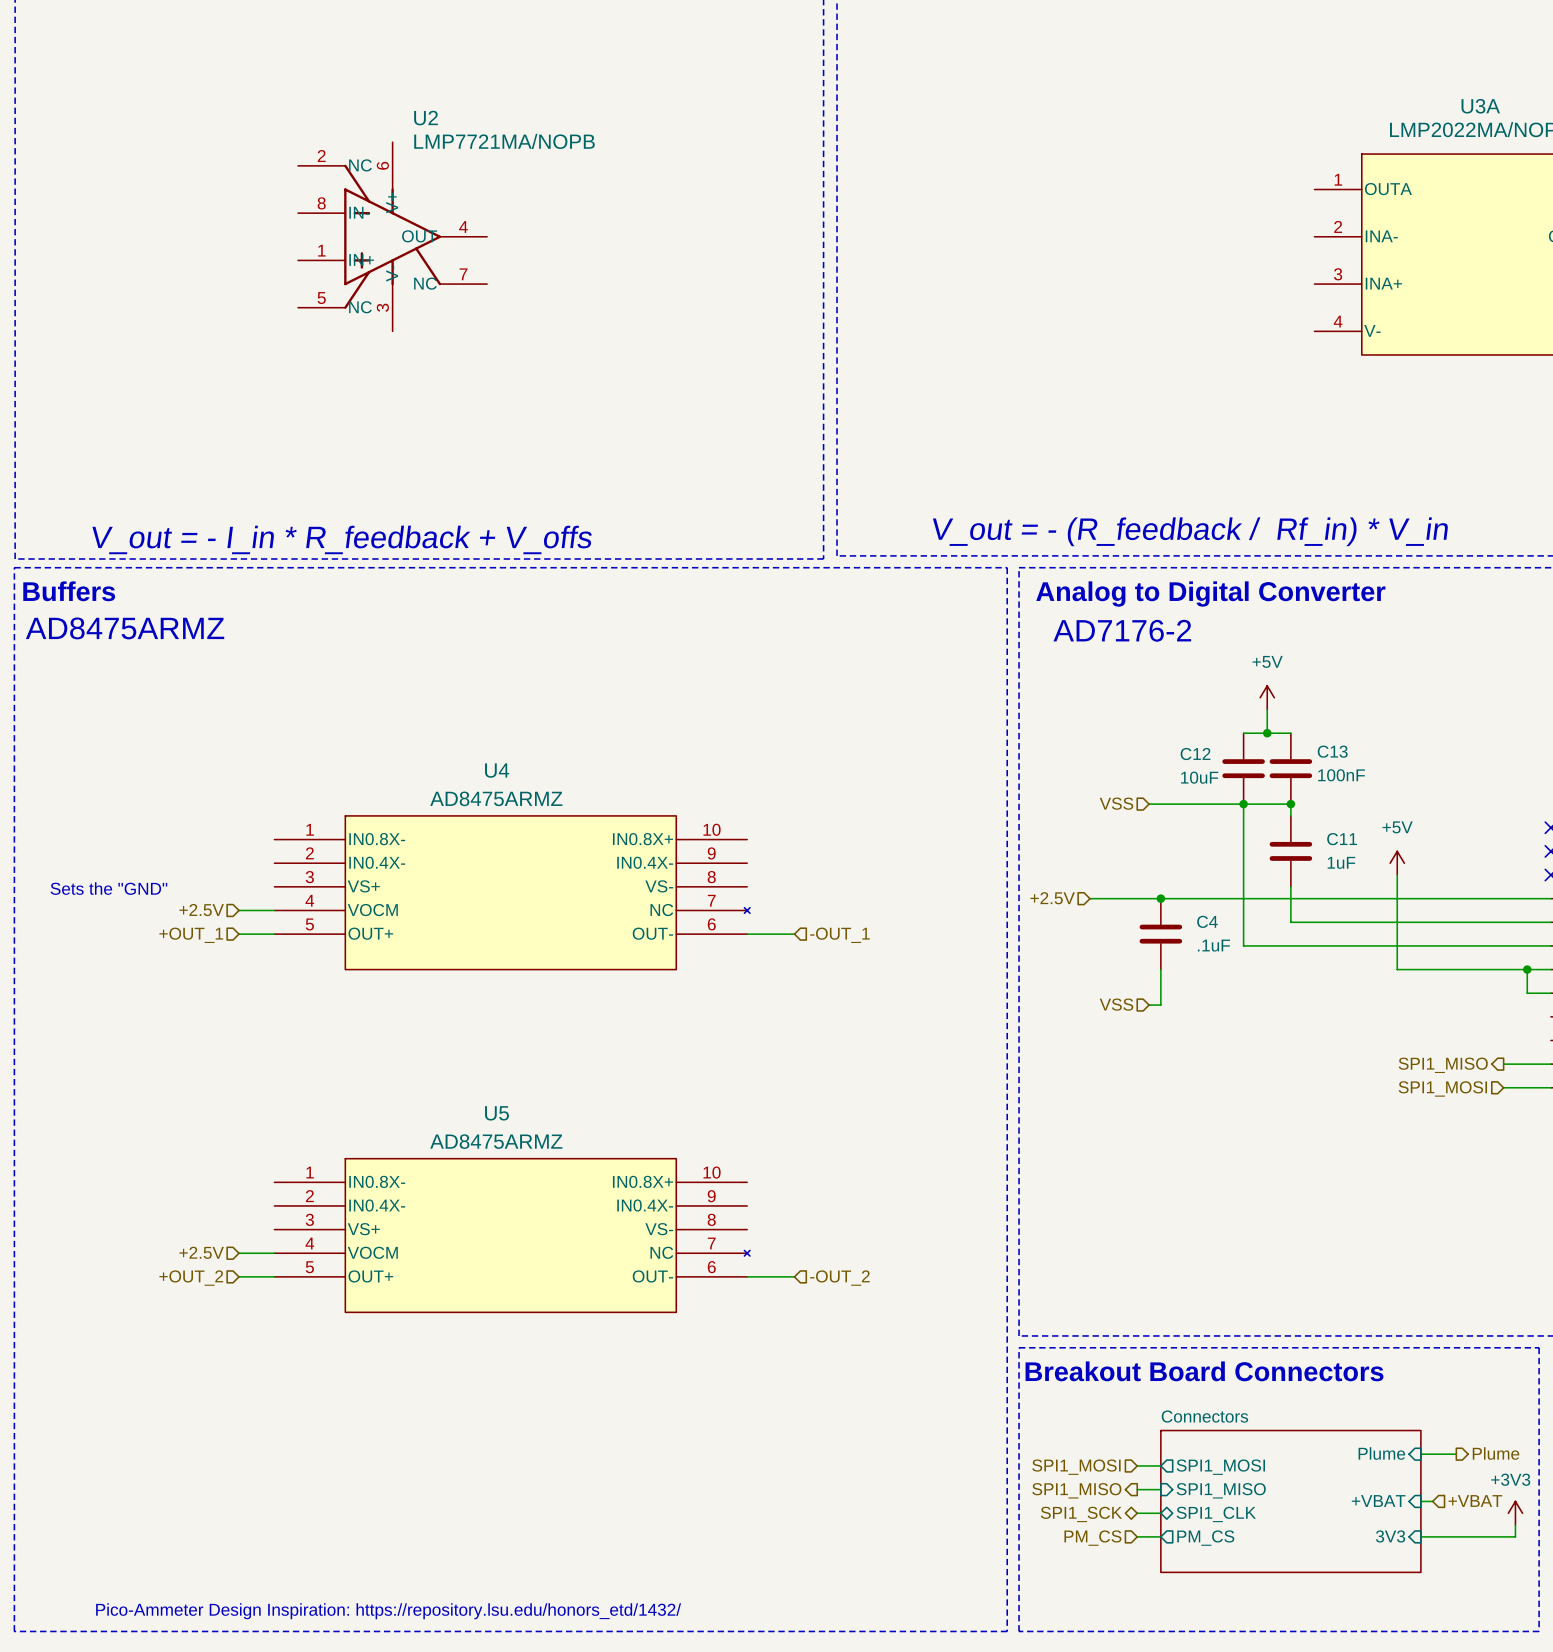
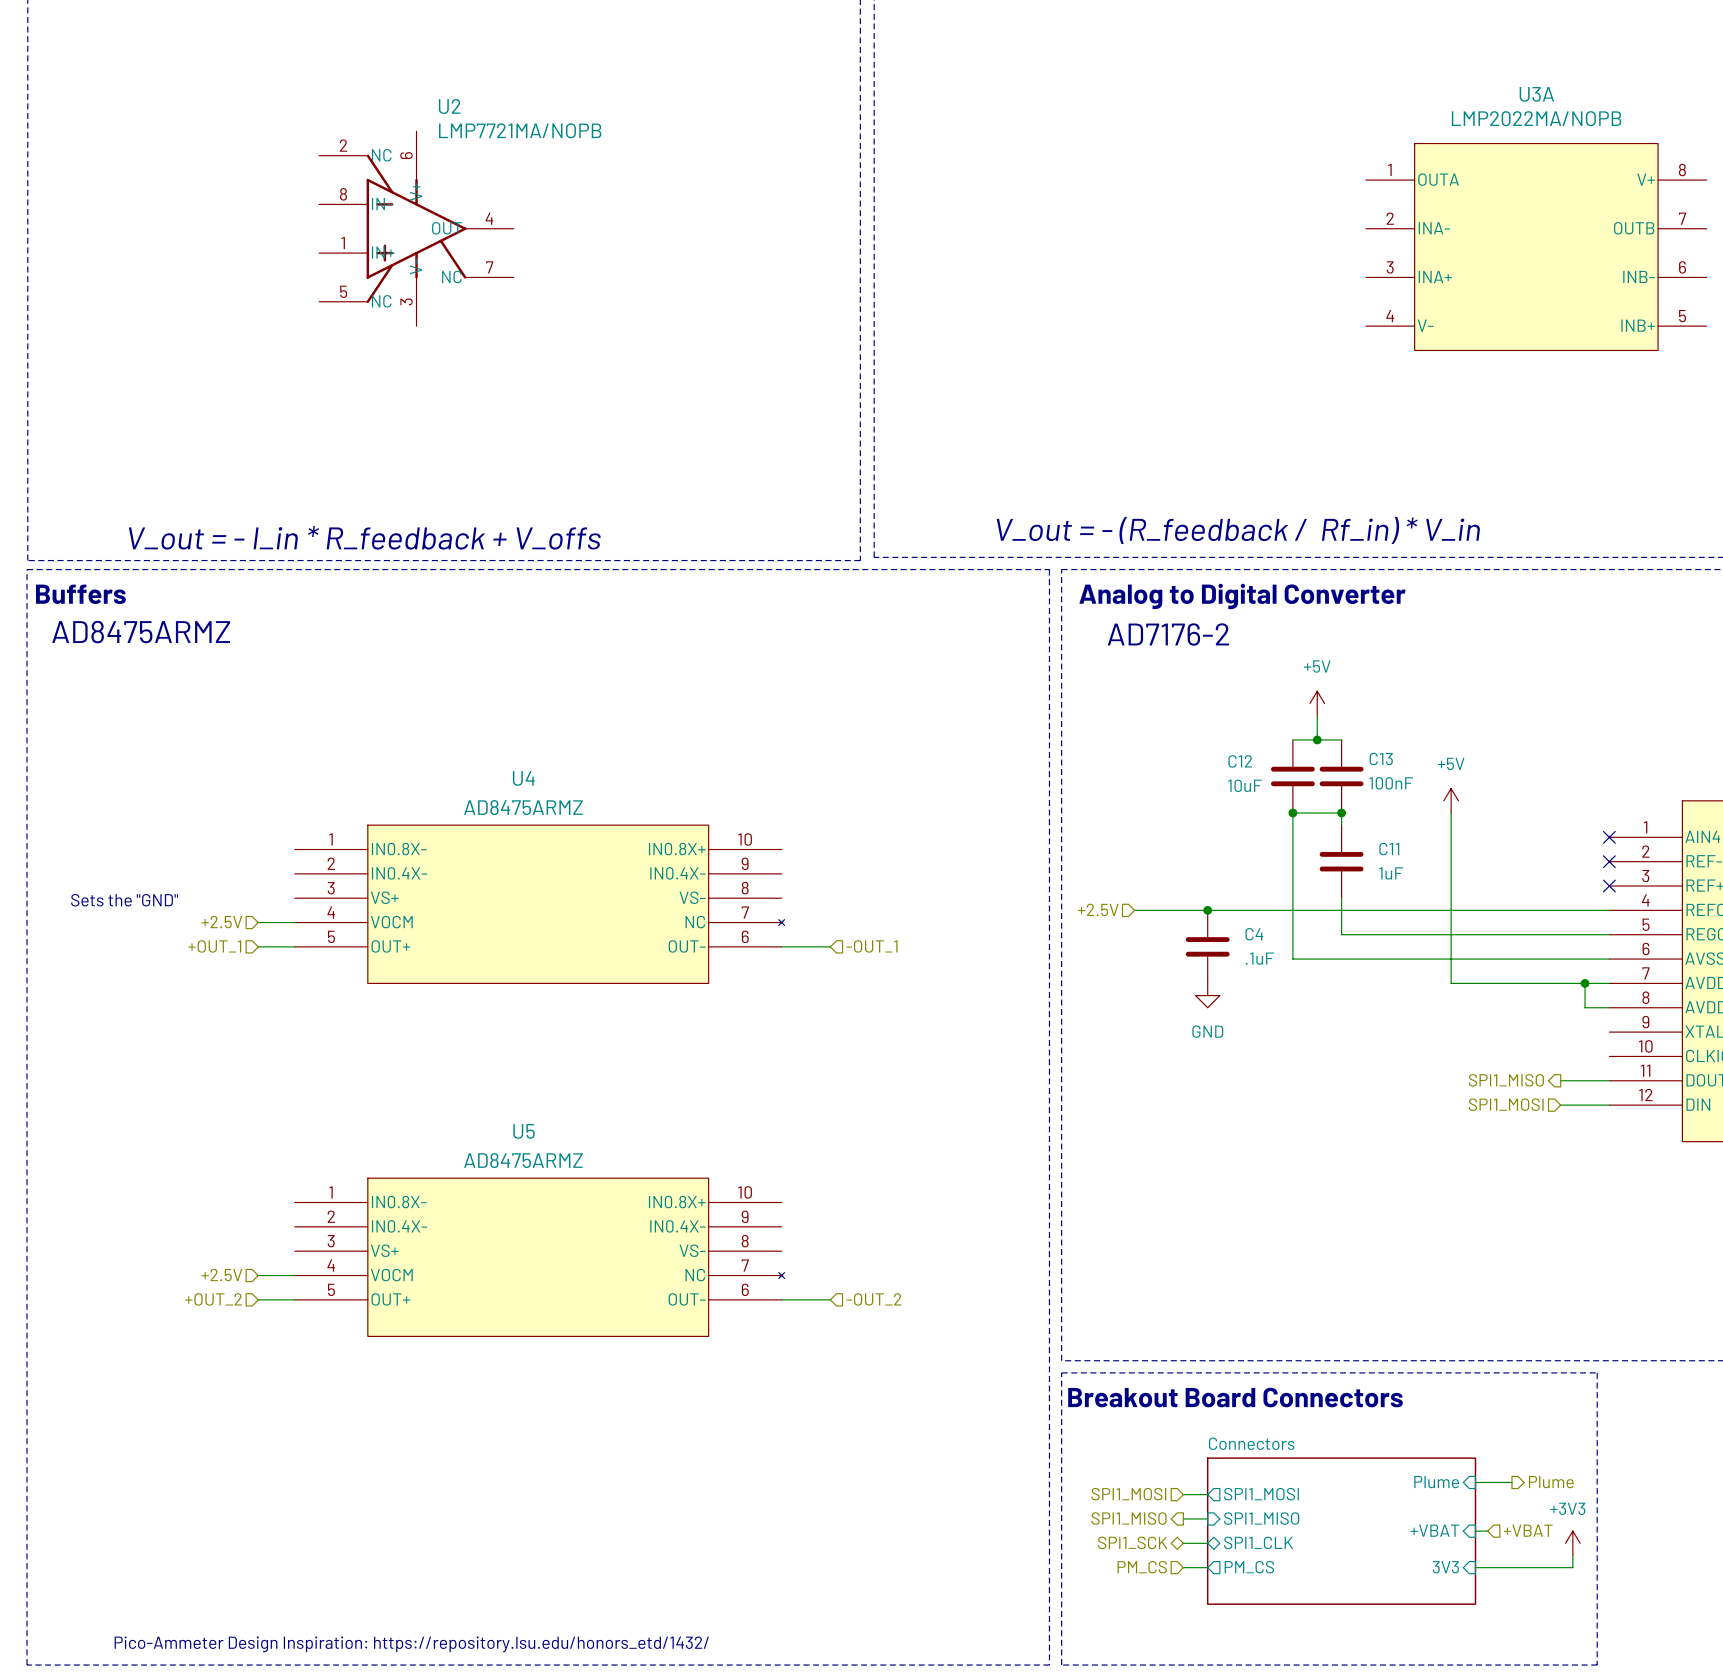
hierarchical label: VSS (1116, 803) -> none
wire: (1149, 804) (1243, 804) -> none
wire: none -> (1451, 813) (1451, 886)
power symbol position: +5V (1397, 863) -> +5V (1451, 800)
wire: (1160, 969) (1160, 1005) (1149, 1005) -> none
power symbol: none -> GND (1207, 995)
hierarchical label: VSS (1116, 1004) -> none

